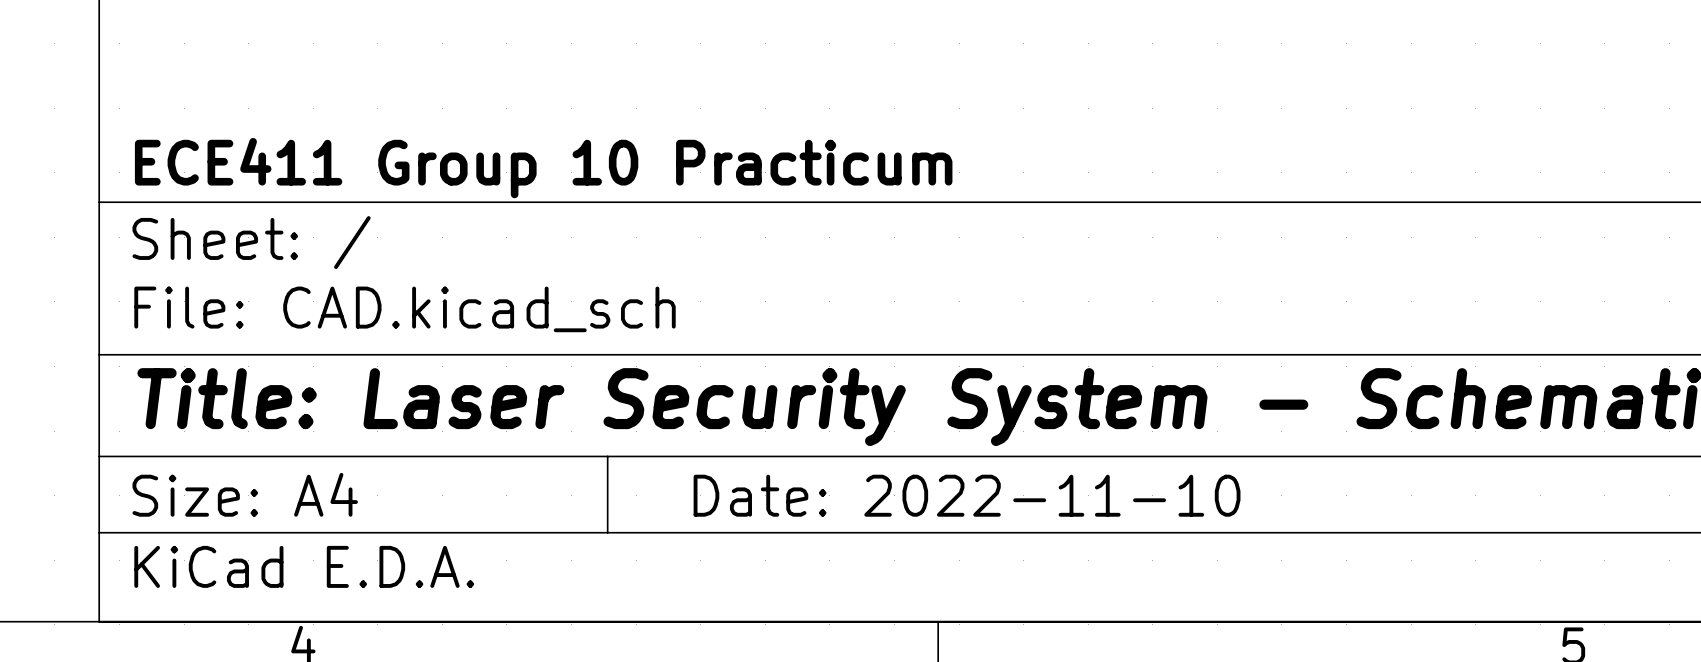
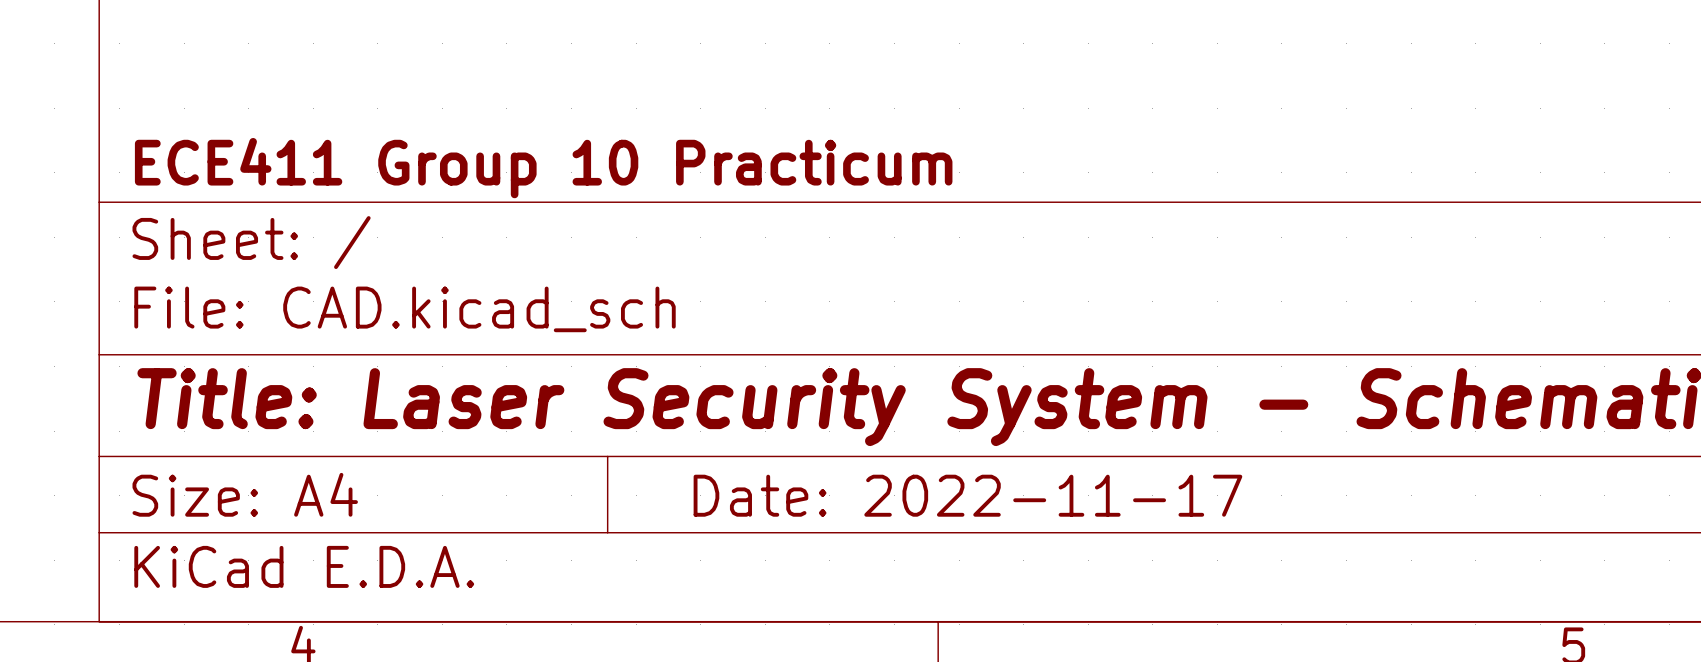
title block: Date: 2022-11-10 (967, 495) -> Date: 2022-11-17 (967, 495)

